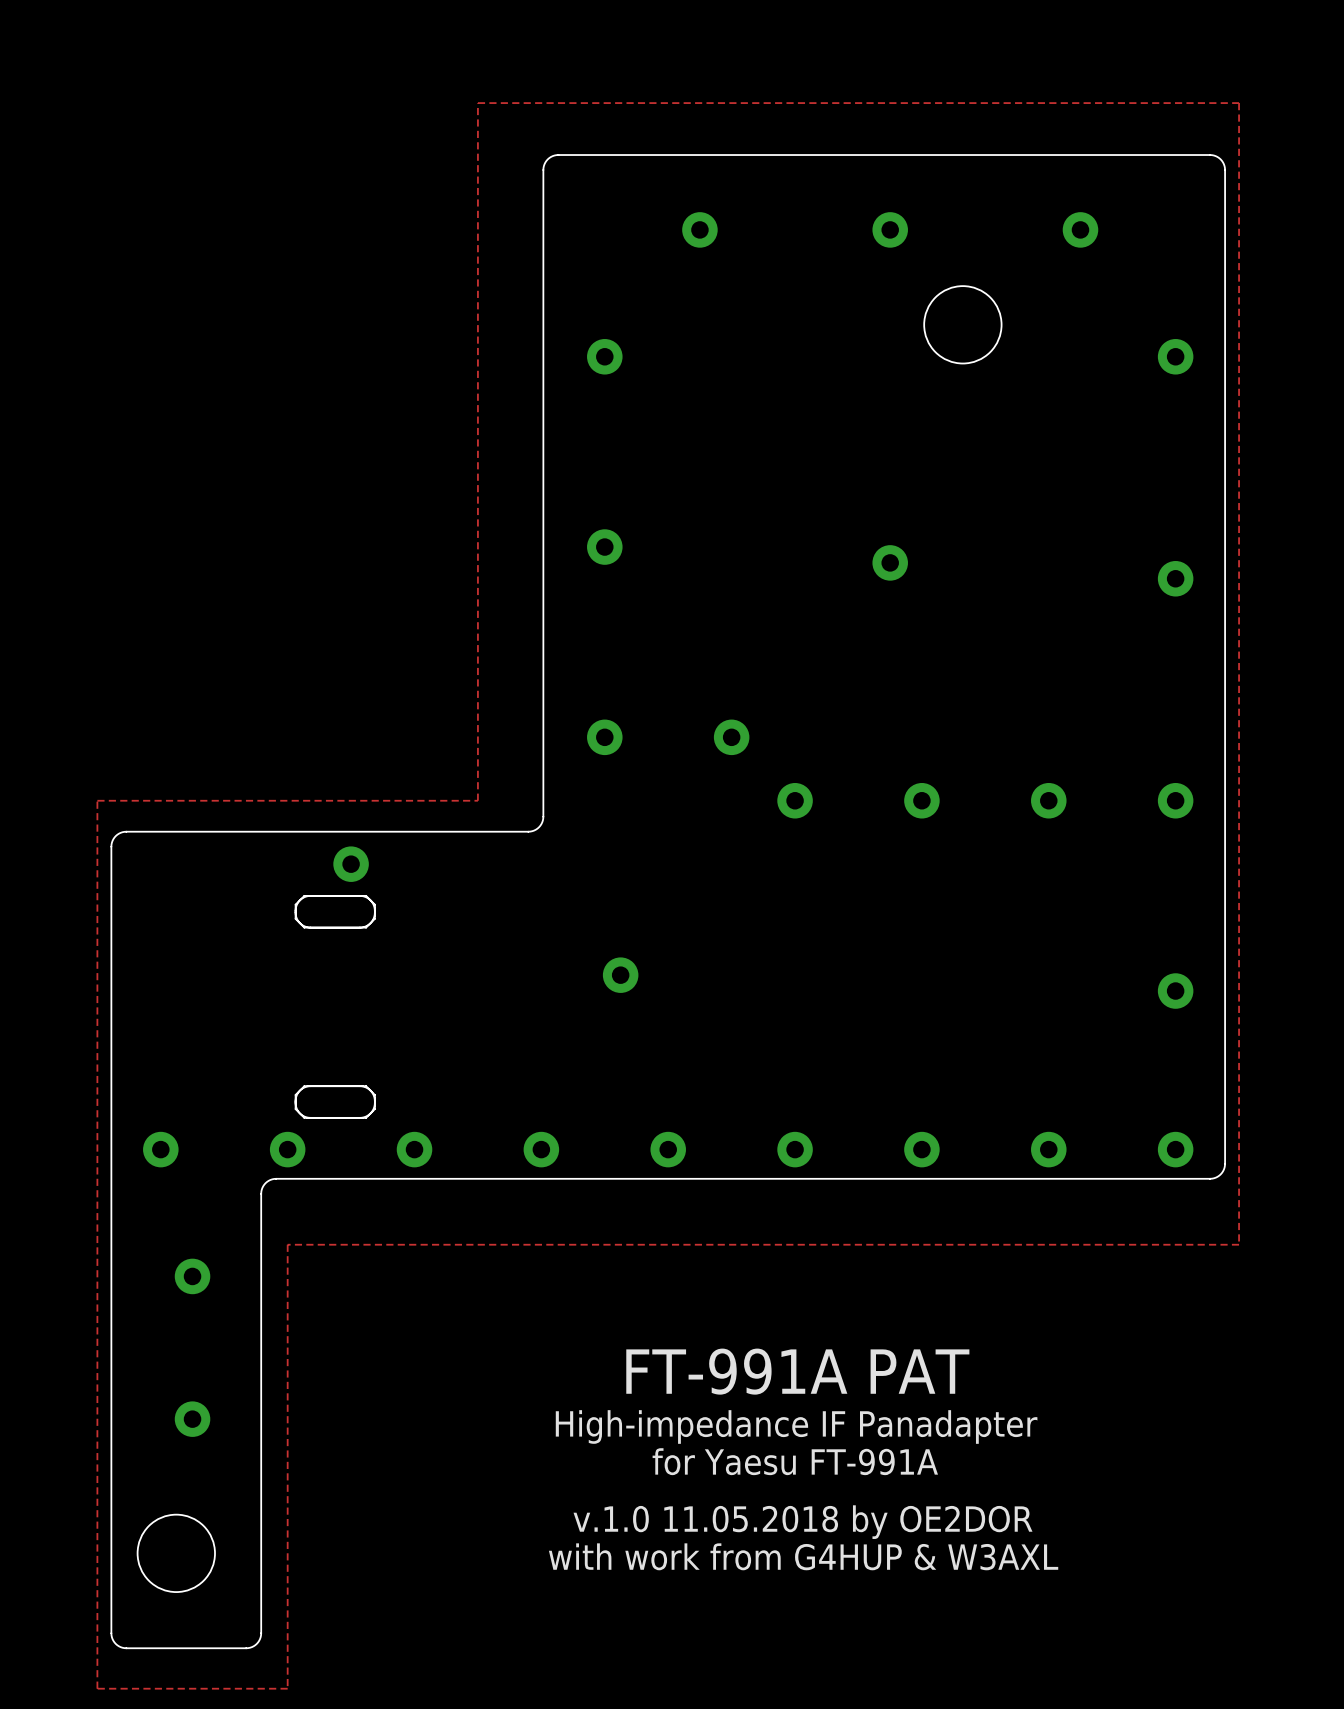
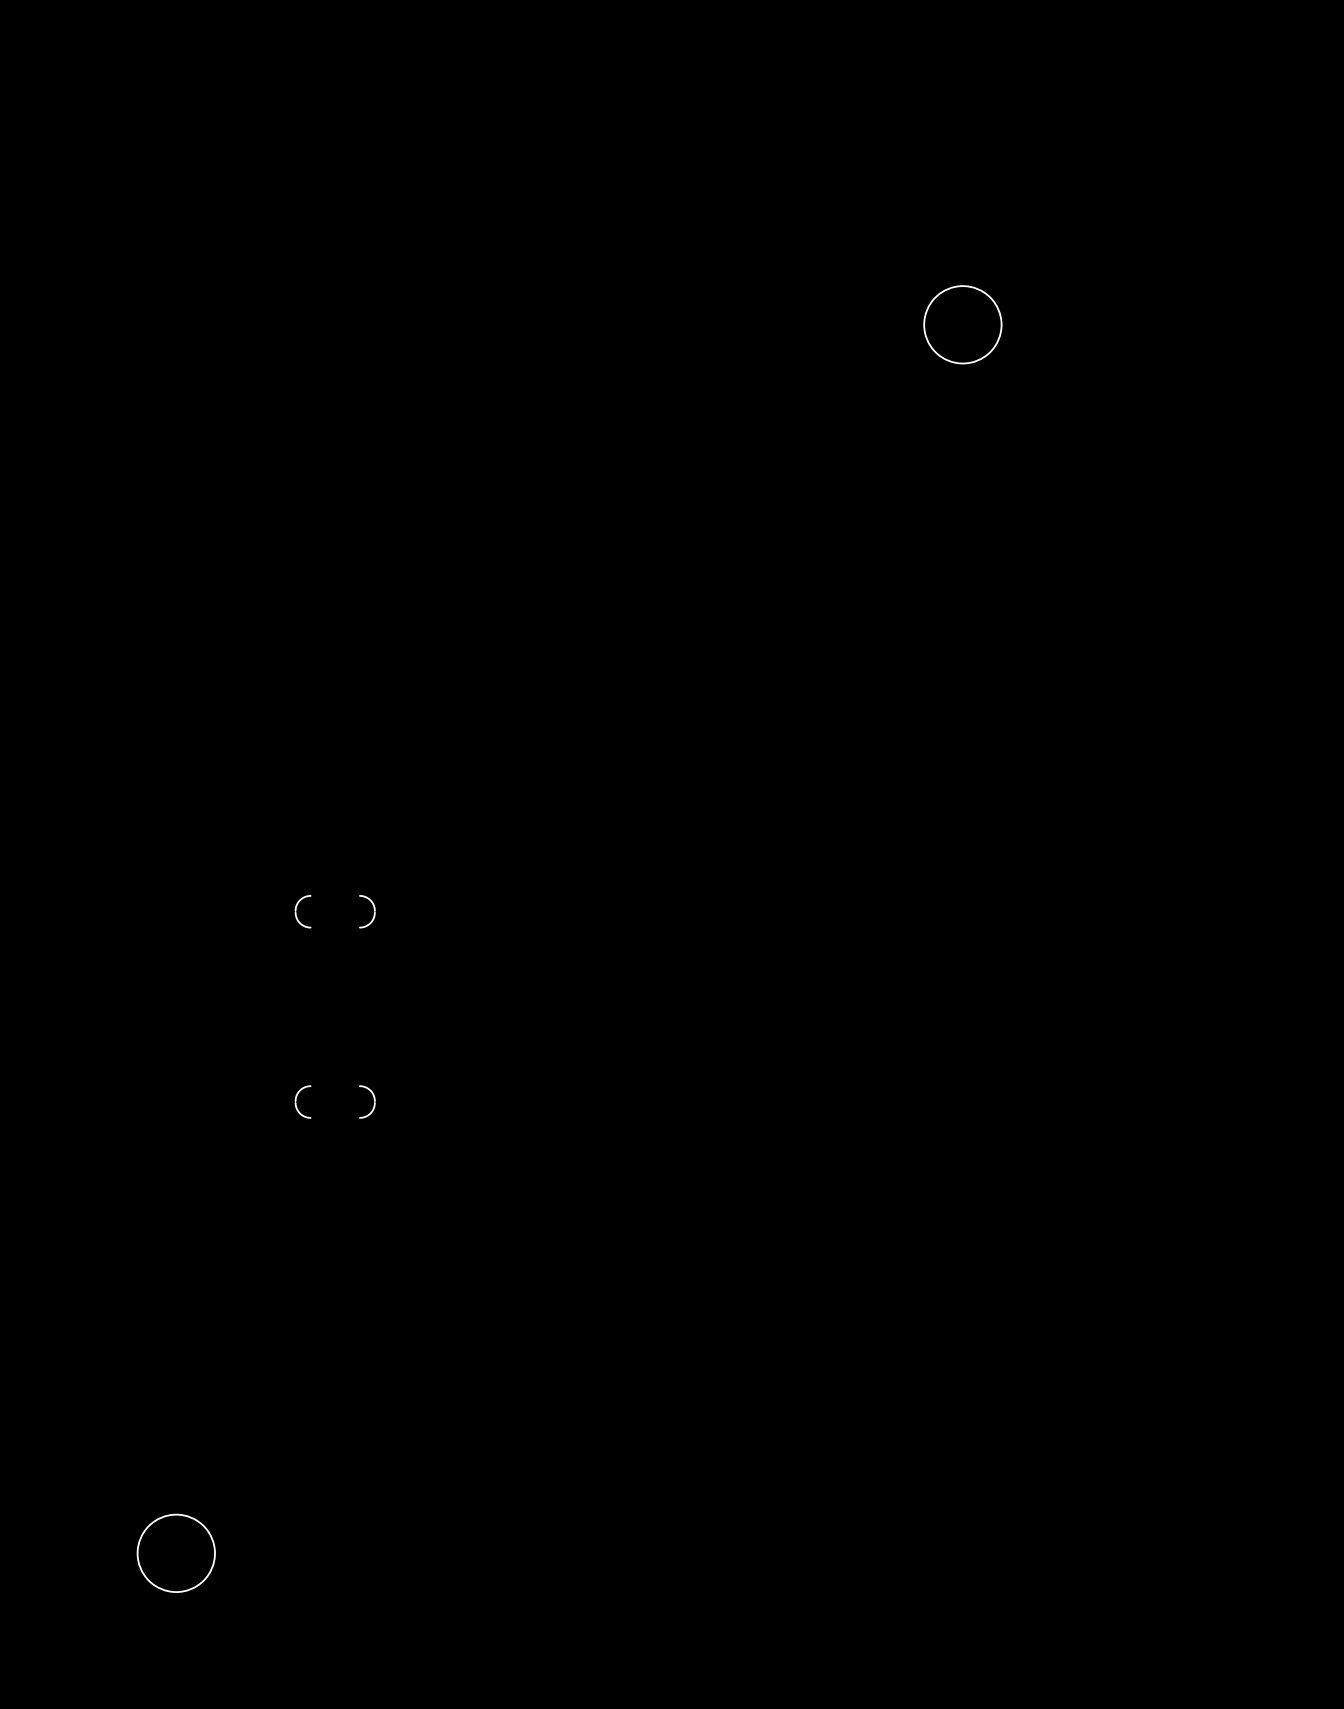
zone outline: (477, 103) (477, 800) (97, 800) (97, 1688) (287, 1688) (287, 1244) (1239, 1244) (1239, 103) (477, 103) -> none
board edge: (558, 155) (1210, 155) (1217, 157) (1223, 162) (1225, 169) (1224, 1167) (1219, 1175) (1210, 1178) (270, 1179) (264, 1184) (261, 1193) (260, 1637) (256, 1643) (248, 1648) (122, 1647) (114, 1642) (111, 1633) (111, 842) (117, 834) (126, 831) (528, 831) (535, 829) (541, 824) (543, 816) (543, 169) (547, 159) (558, 155) -> none
via: (699, 229) -> none
via: (890, 229) -> none
via: (1080, 229) -> none
via: (604, 356) -> none
via: (1175, 356) -> none
via: (604, 547) -> none
via: (890, 562) -> none
via: (1175, 578) -> none
via: (604, 737) -> none
via: (731, 737) -> none
via: (795, 800) -> none
via: (921, 800) -> none
via: (1048, 800) -> none
via: (1175, 800) -> none
via: (351, 864) -> none
board edge: (304, 895) (295, 904) (295, 918) (304, 927) (366, 927) (374, 918) (374, 904) (366, 895) (304, 895) -> none
via: (620, 975) -> none
via: (1175, 991) -> none
board edge: (304, 1086) (366, 1086) (374, 1094) (374, 1109) (366, 1117) (304, 1117) (295, 1109) (295, 1094) (304, 1086) -> none
via: (160, 1149) -> none
via: (287, 1149) -> none
via: (414, 1149) -> none
via: (541, 1149) -> none
via: (668, 1149) -> none
via: (795, 1149) -> none
via: (921, 1149) -> none
via: (1048, 1149) -> none
via: (1175, 1149) -> none
via: (192, 1276) -> none
text: FT-991A PAT (797, 1371) -> none
via: (192, 1419) -> none
text: High-impedance IF Panadapter (796, 1426) -> none
text: for Yaesu FT-991A (795, 1461) -> none
text: v.1.0 11.05.2018 by OE2DOR (803, 1522) -> none
text: with work from G4HUP & W3AXL (803, 1556) -> none

